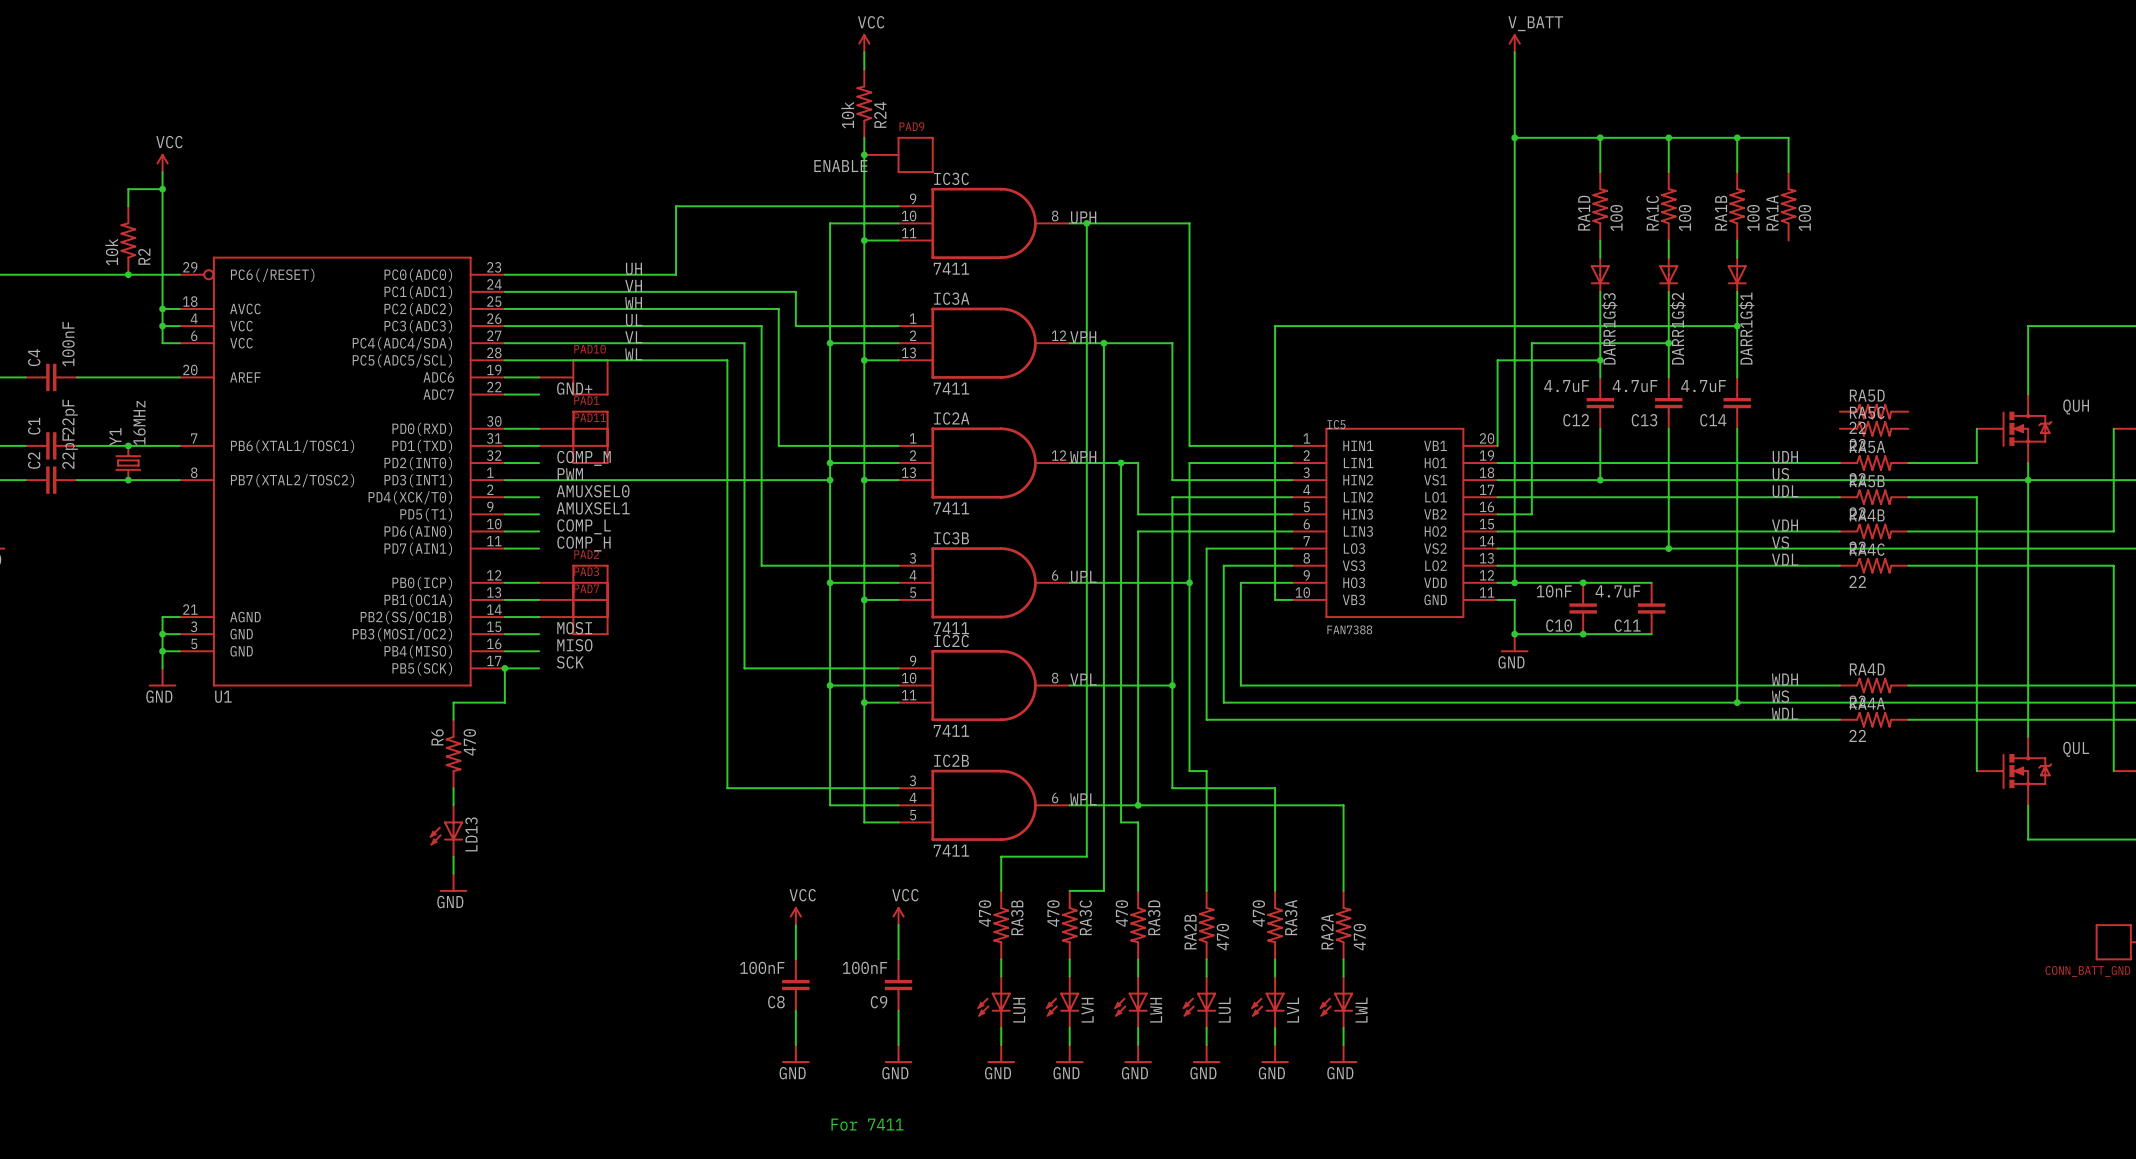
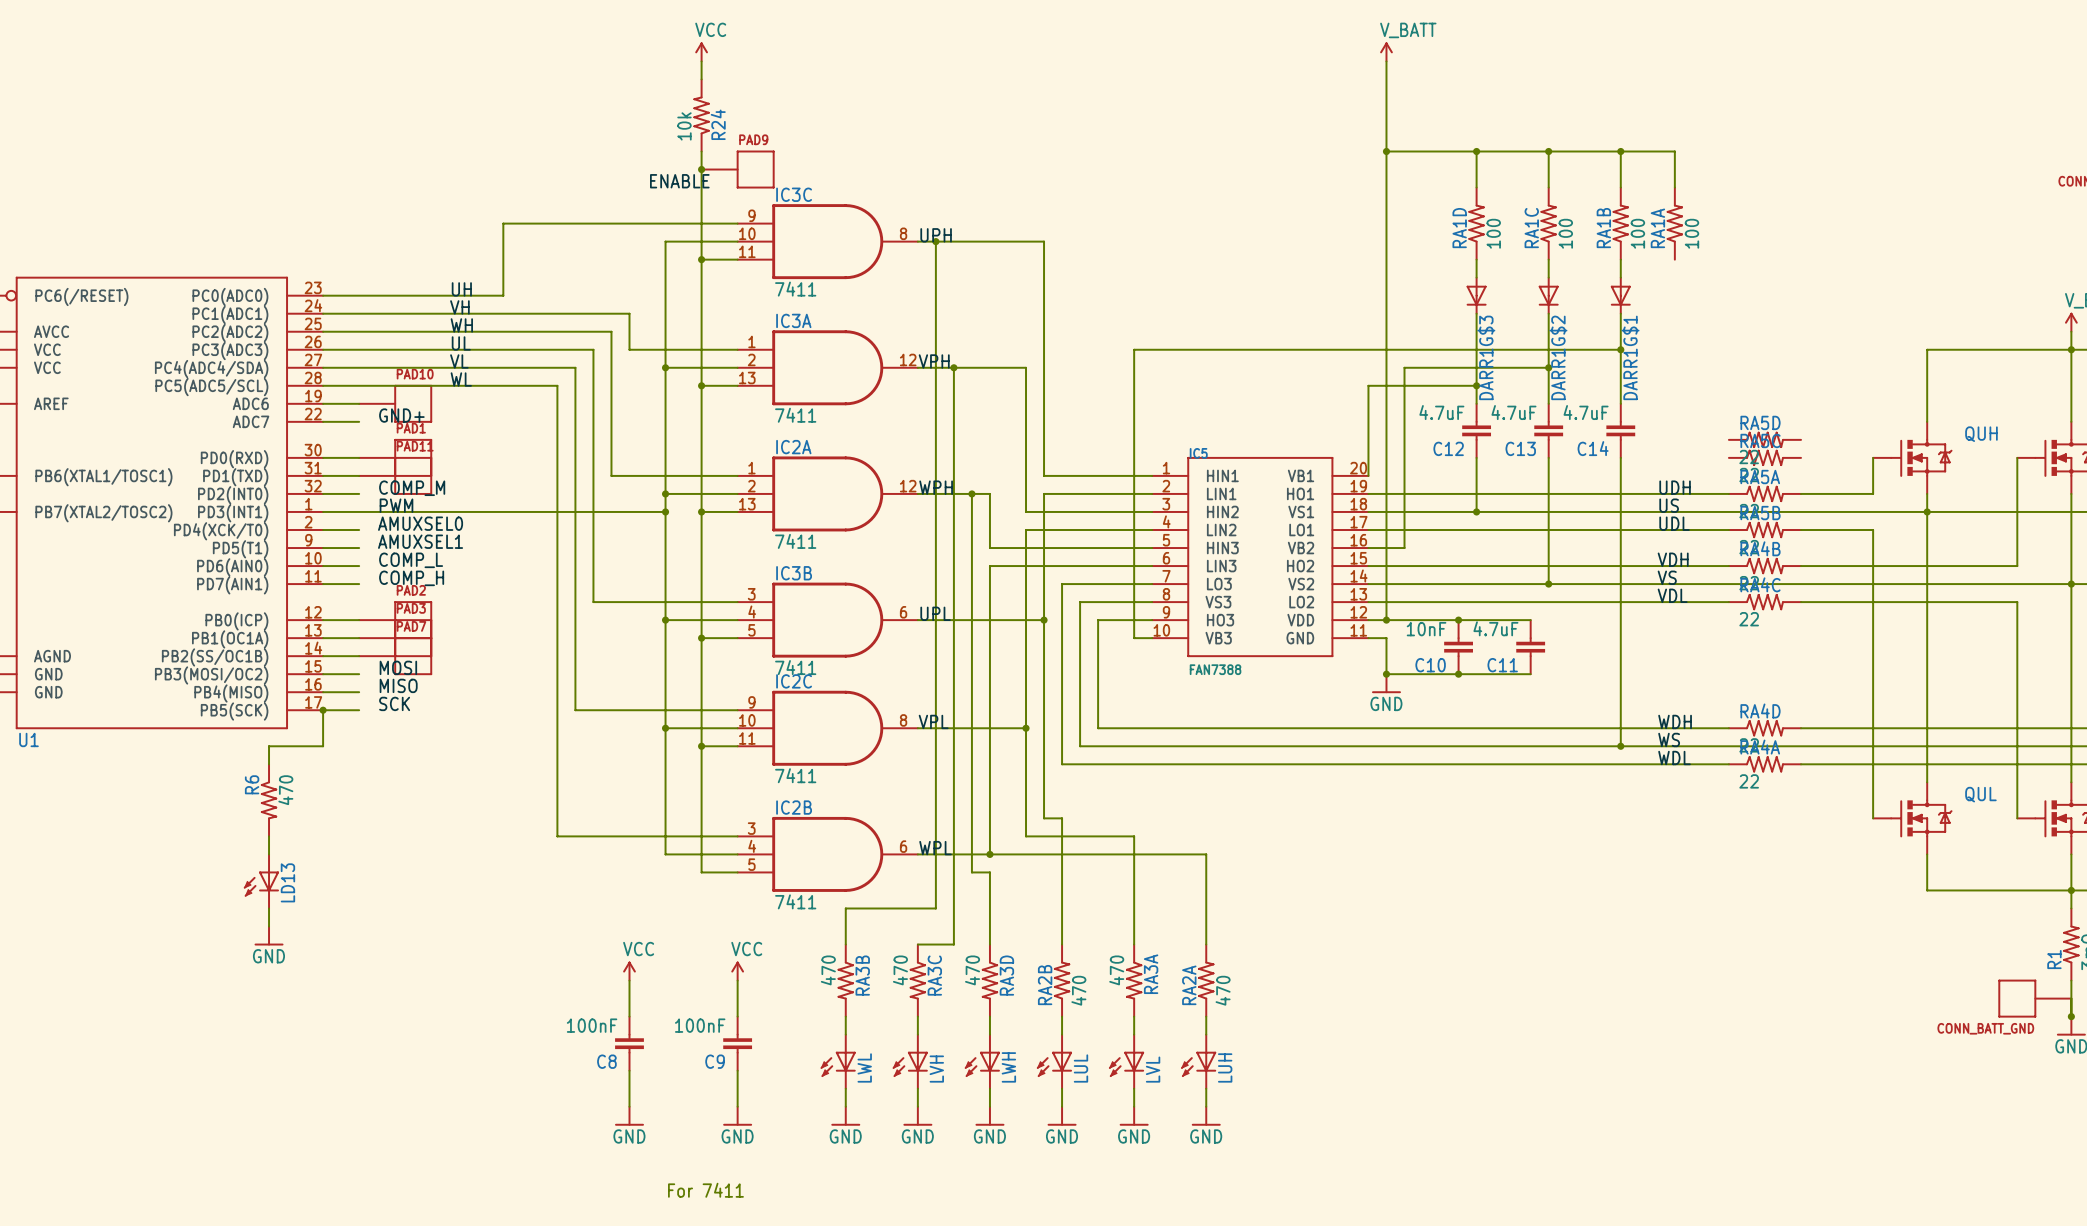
LUH name: LUH (1019, 1010) -> LWL (864, 1067)
LWL name: LWL (1361, 1010) -> LUH (1225, 1067)

